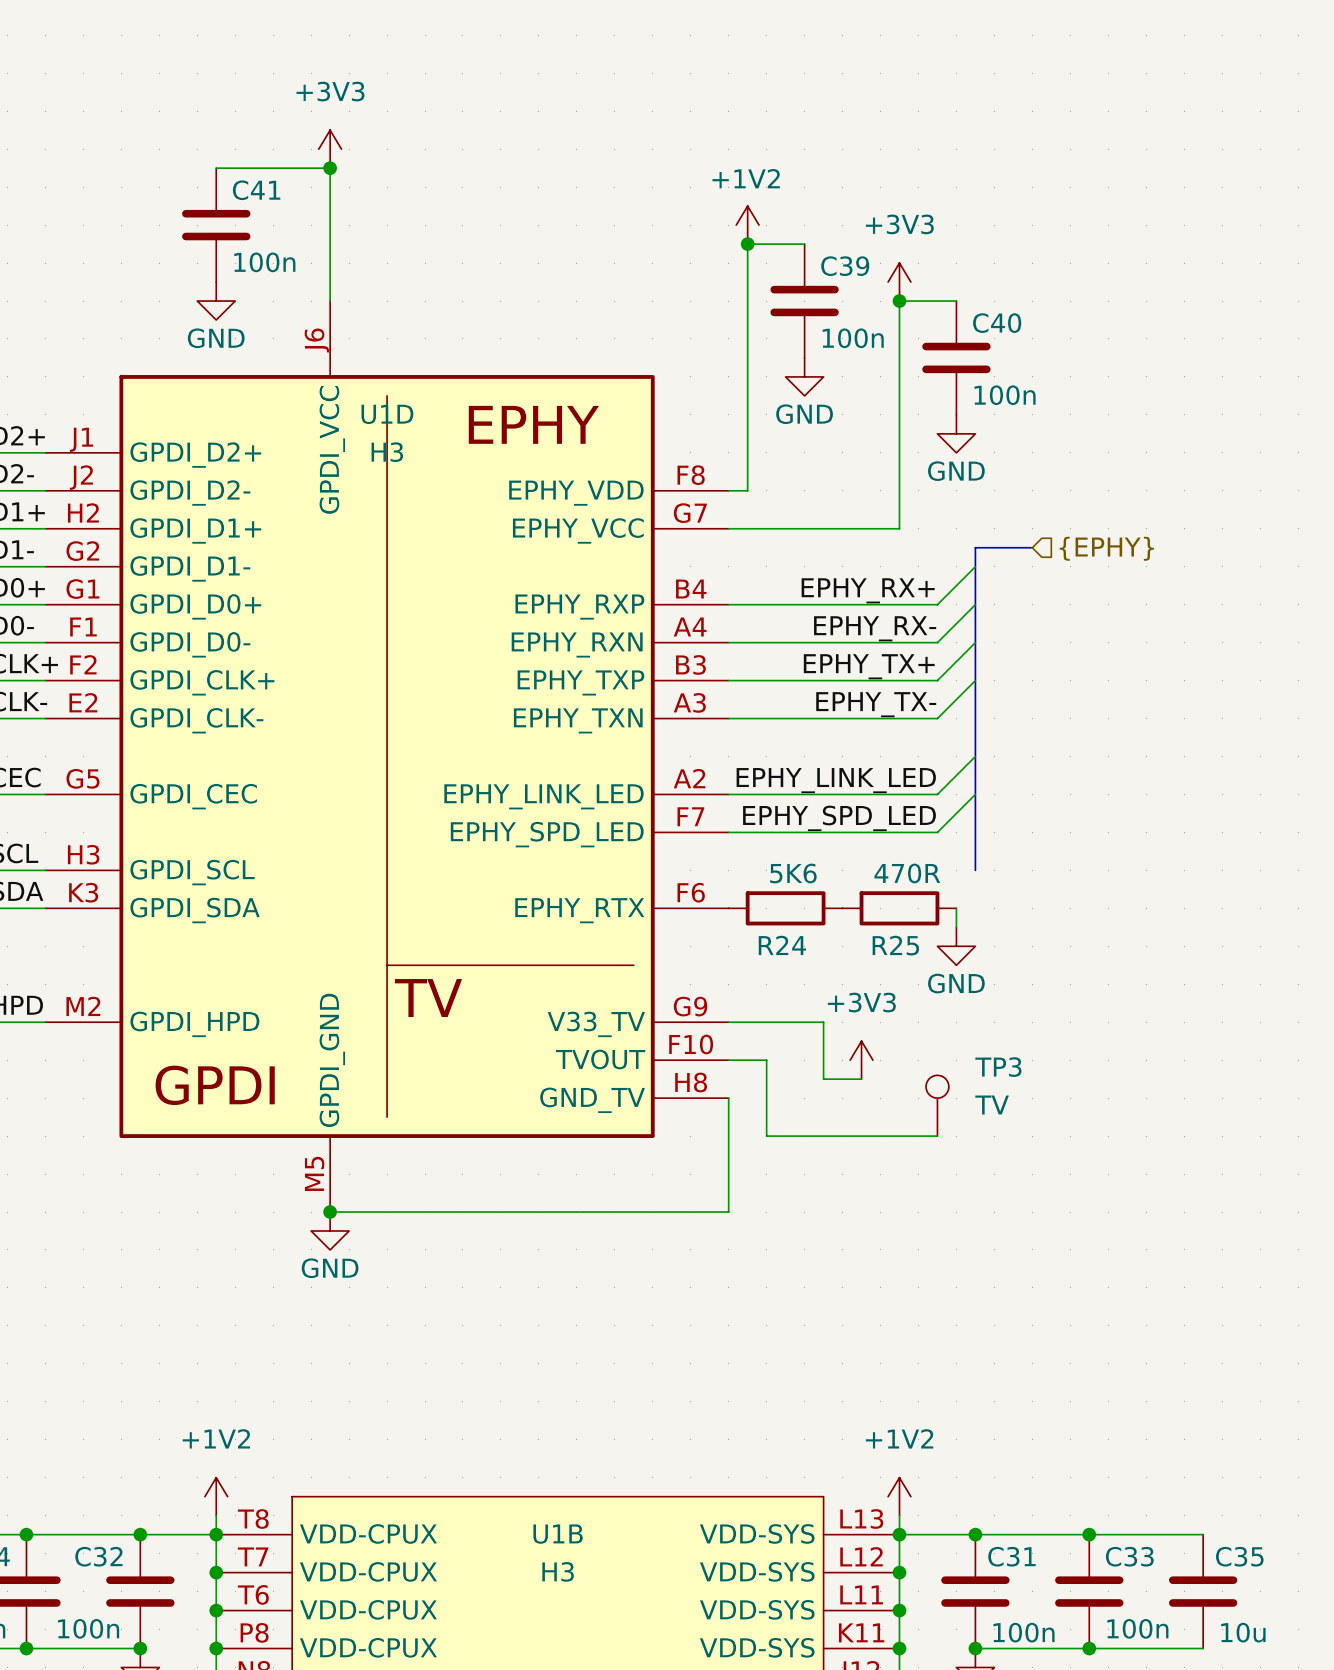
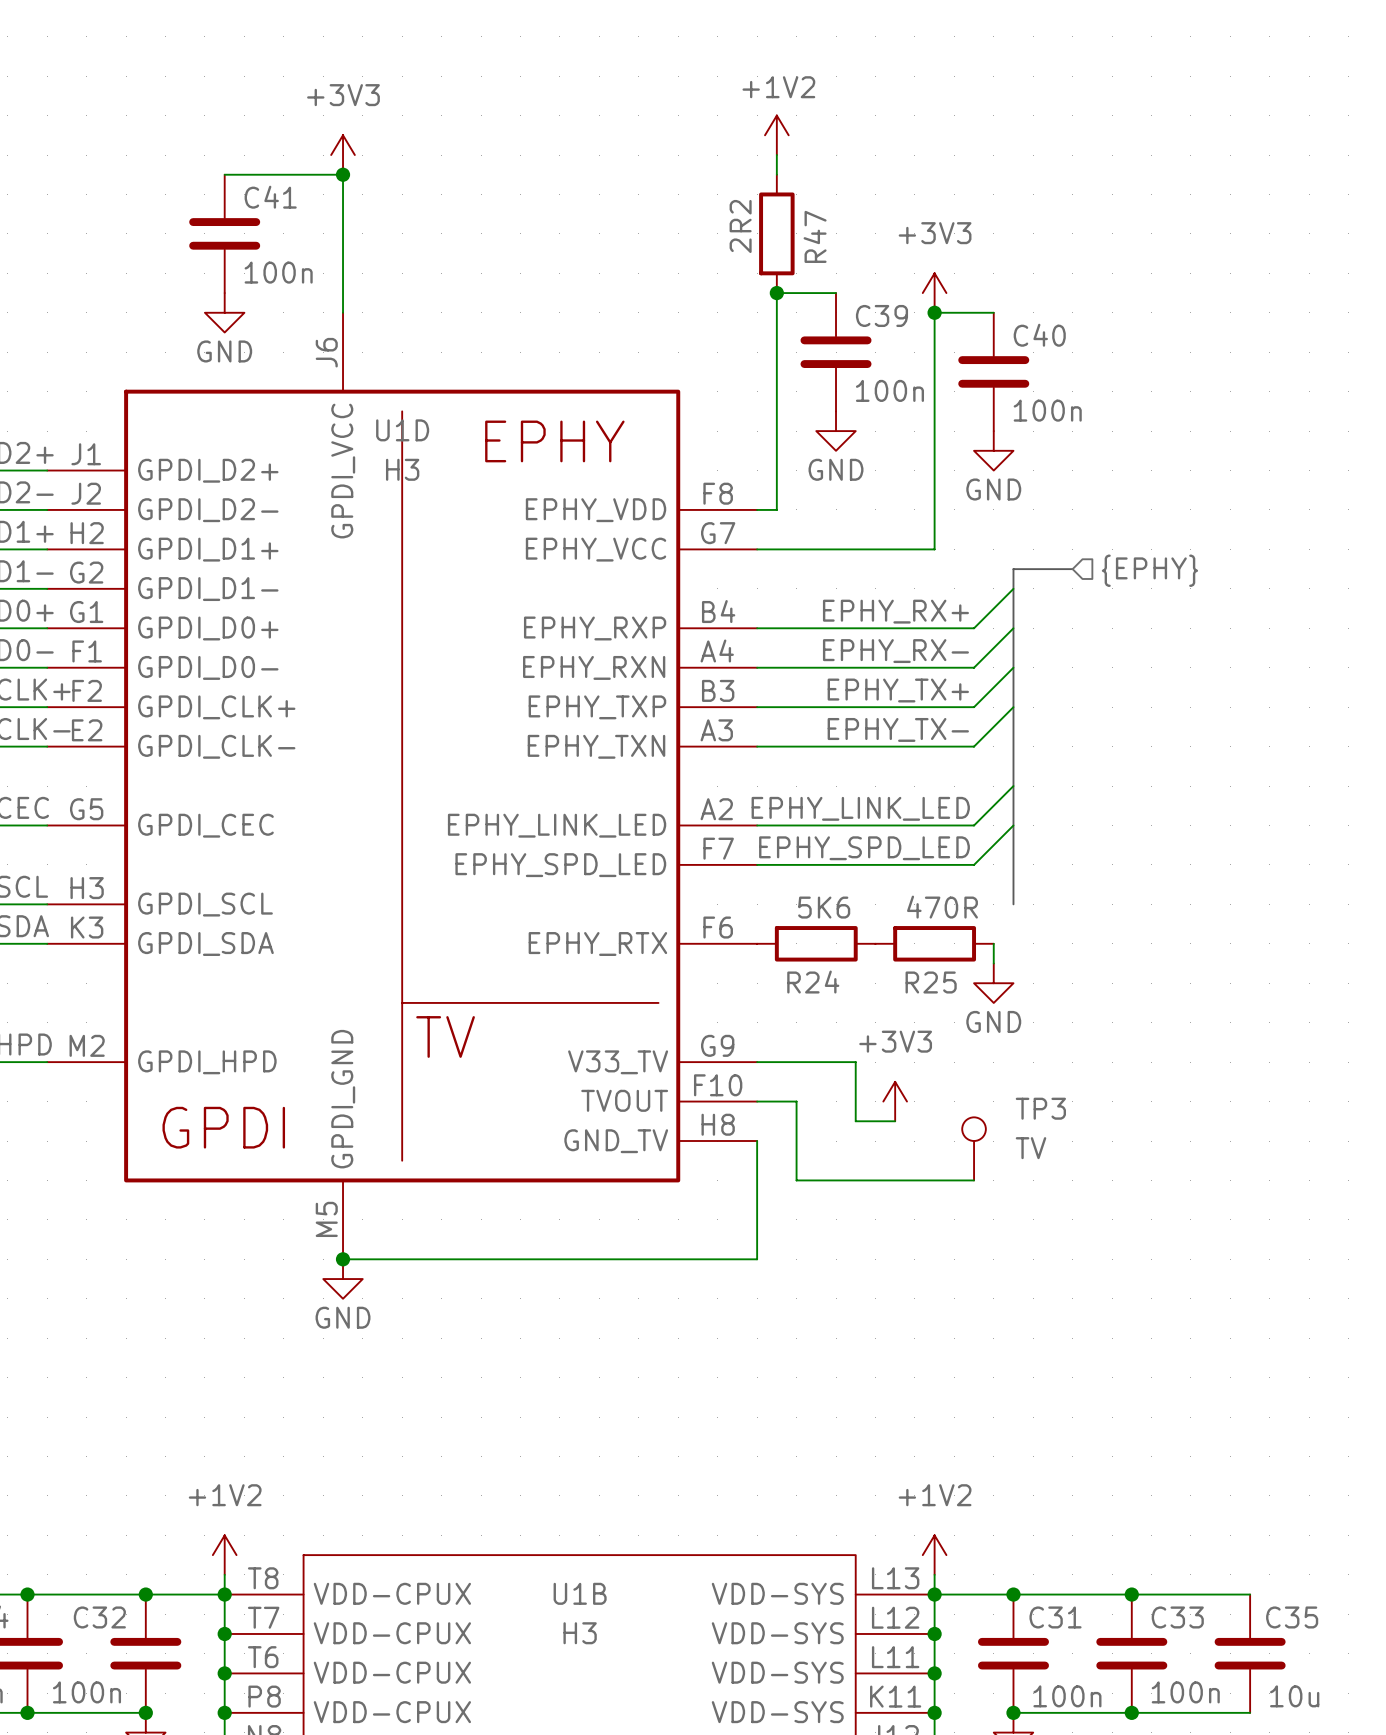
wire: none -> (776, 155) (776, 174)
power symbol position: +1V2 (747, 225) -> +1V2 (776, 135)
R47: none -> 2R2 (776, 233)
junction position: (747, 244) -> (776, 293)
wire: (804, 244) (747, 244) (747, 282) -> (836, 293) (776, 293)
C39 position: (804, 301) -> (836, 352)
power symbol position: GND (804, 376) -> GND (836, 431)

